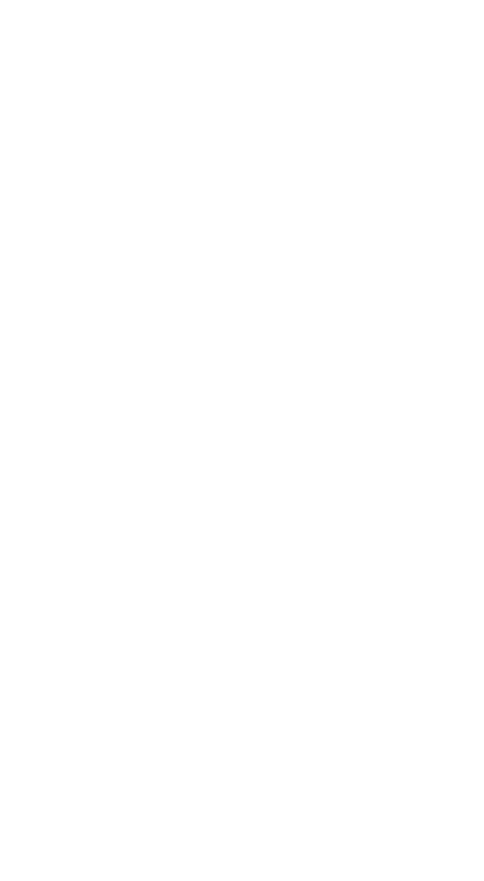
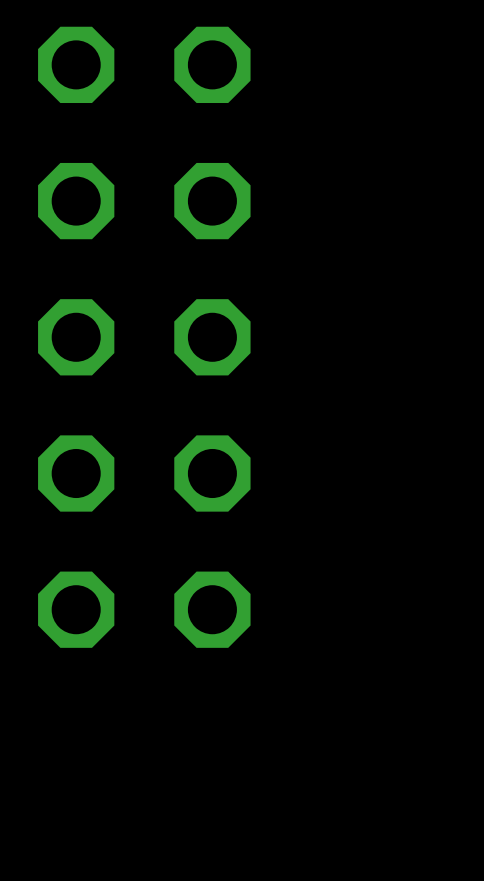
part: none -> (144, 337)

